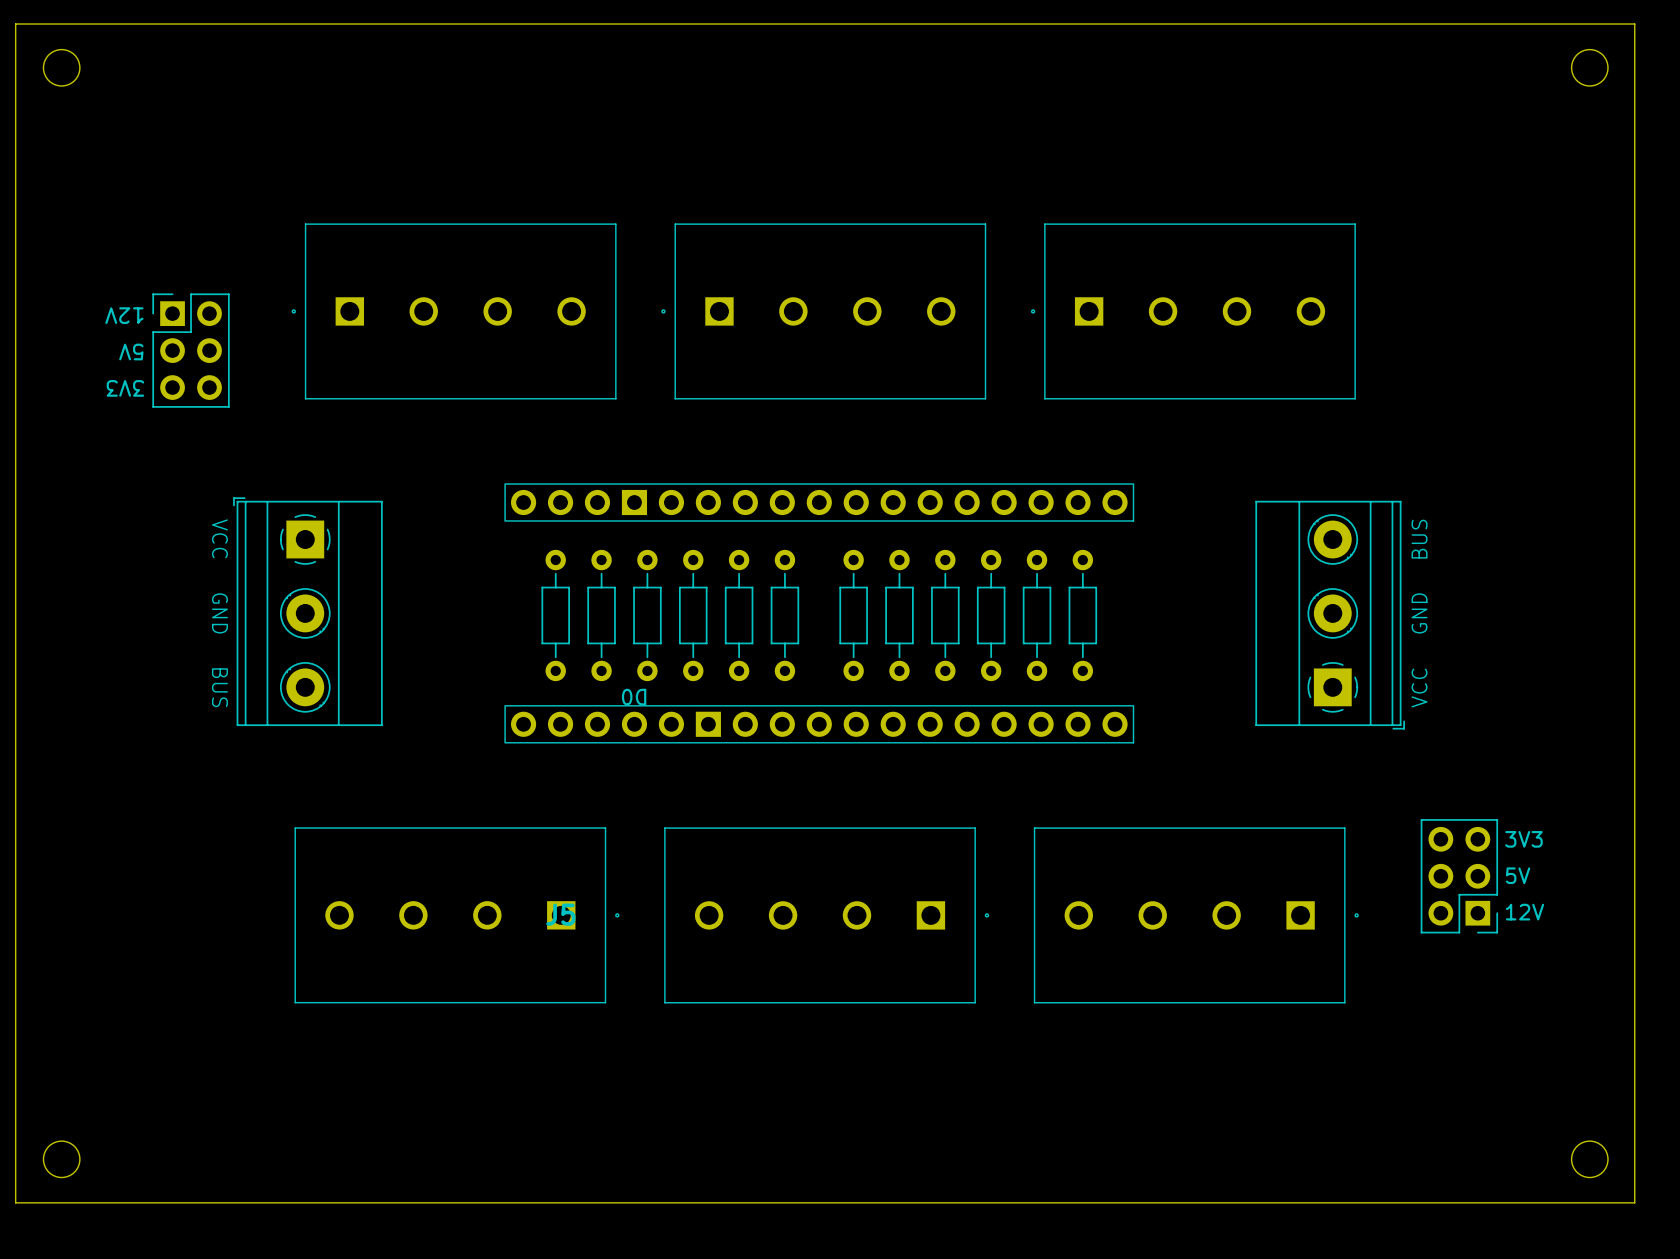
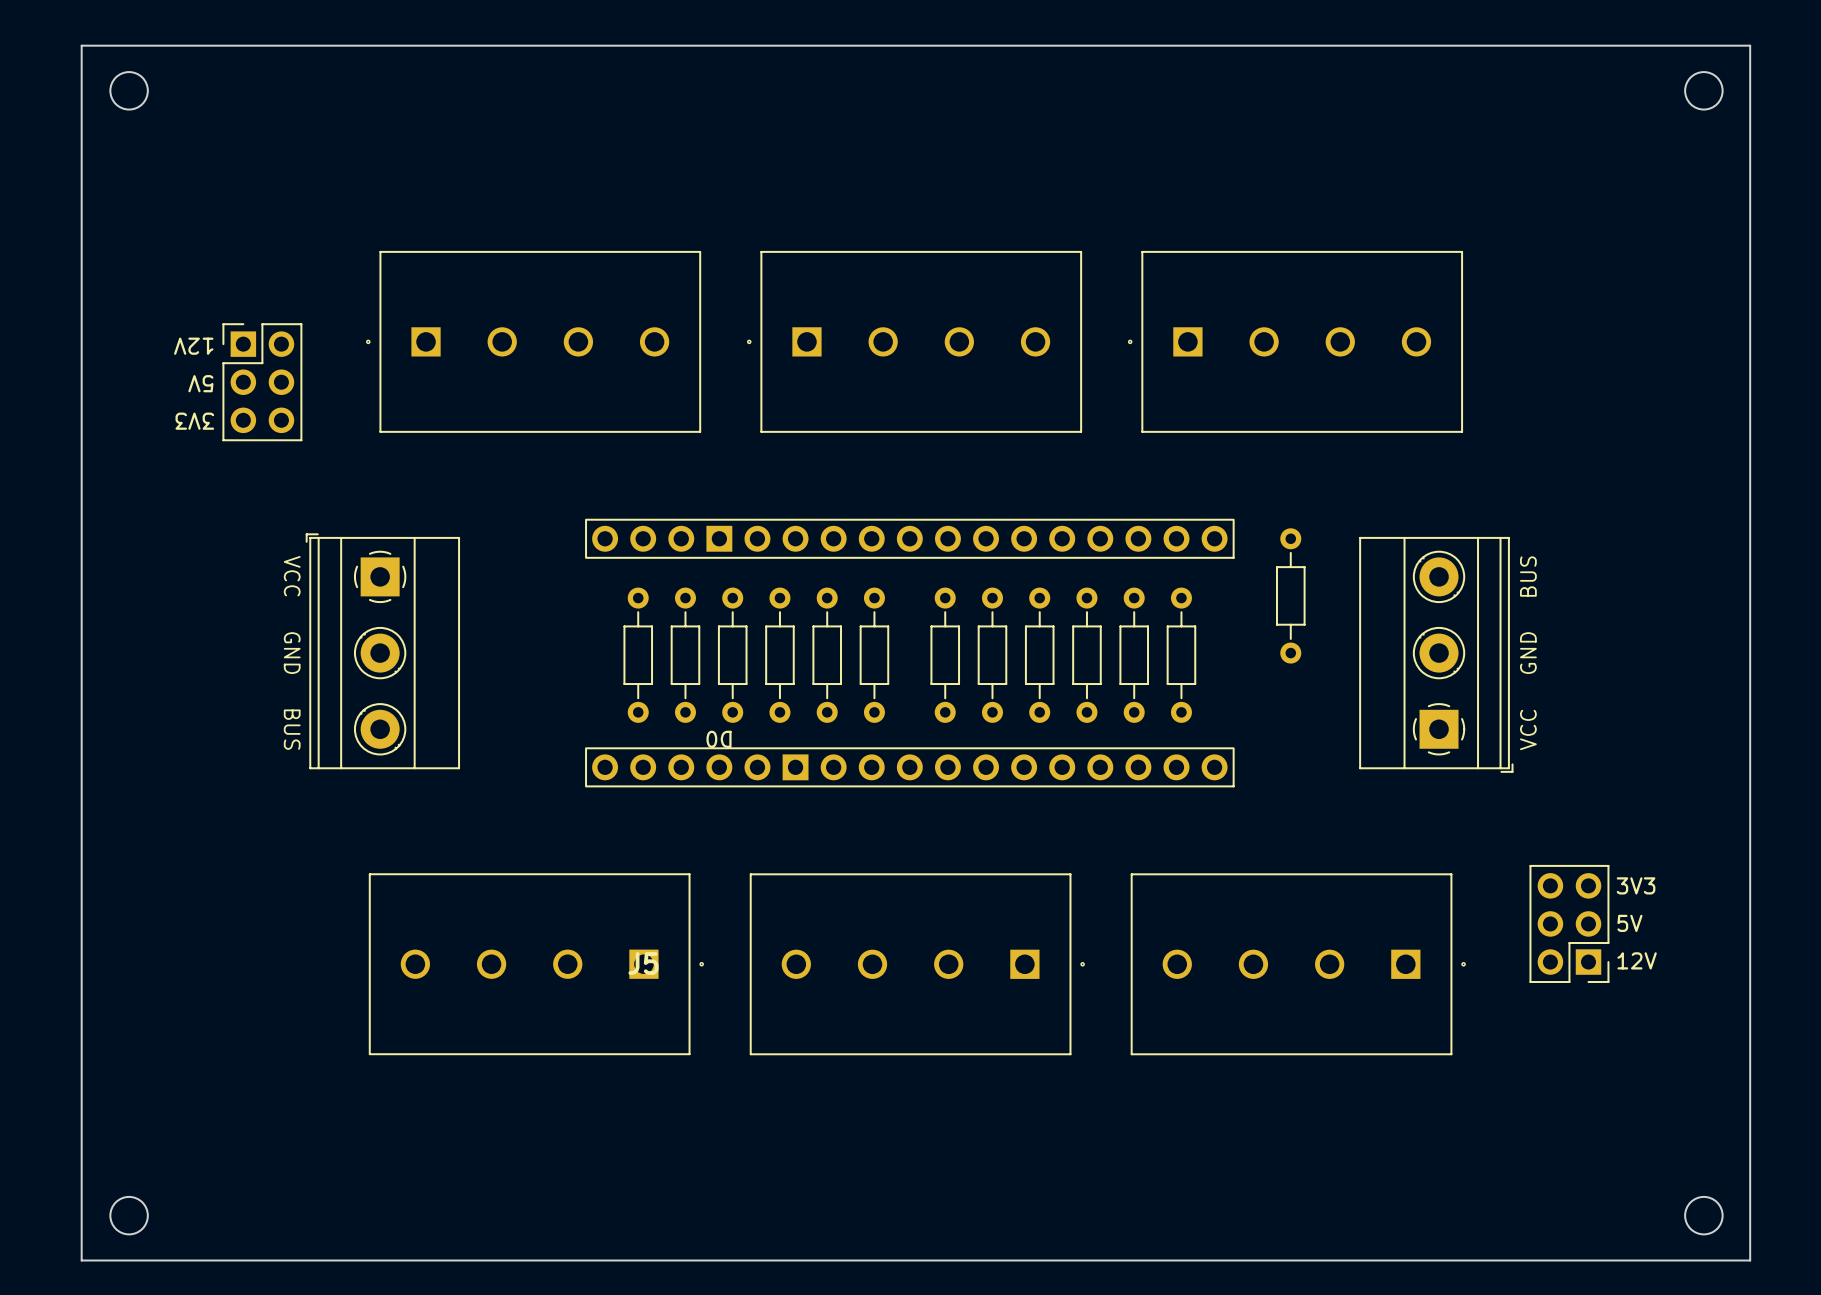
part: none -> (1290, 595)

